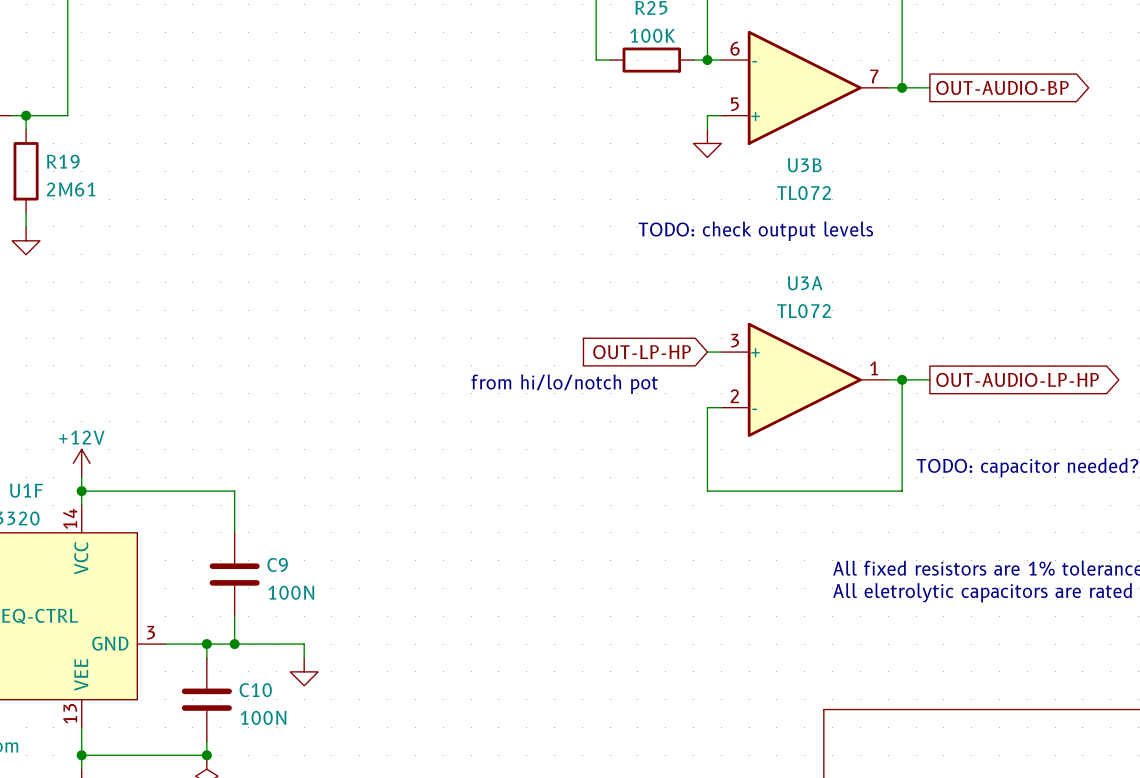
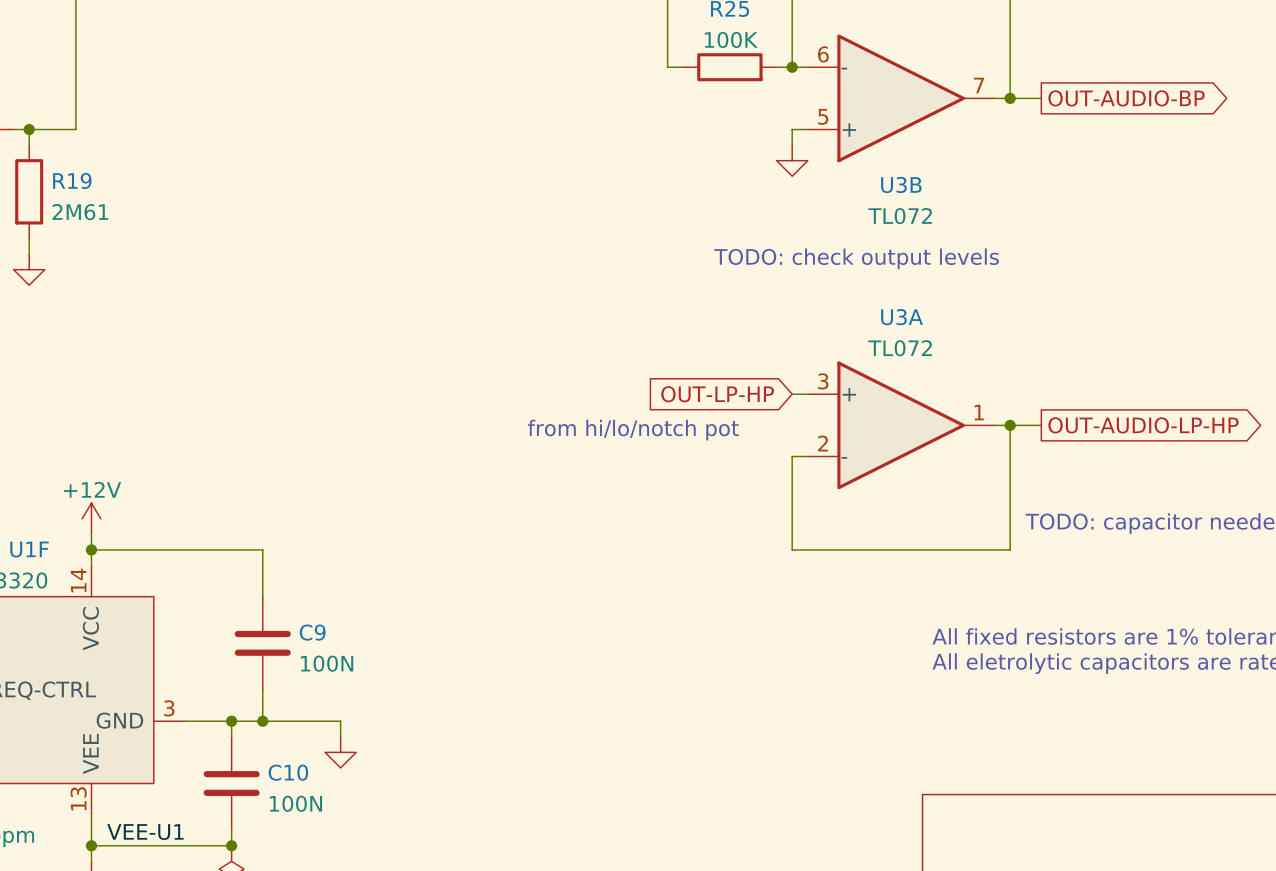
label: none -> VEE-U1 (145, 832)

